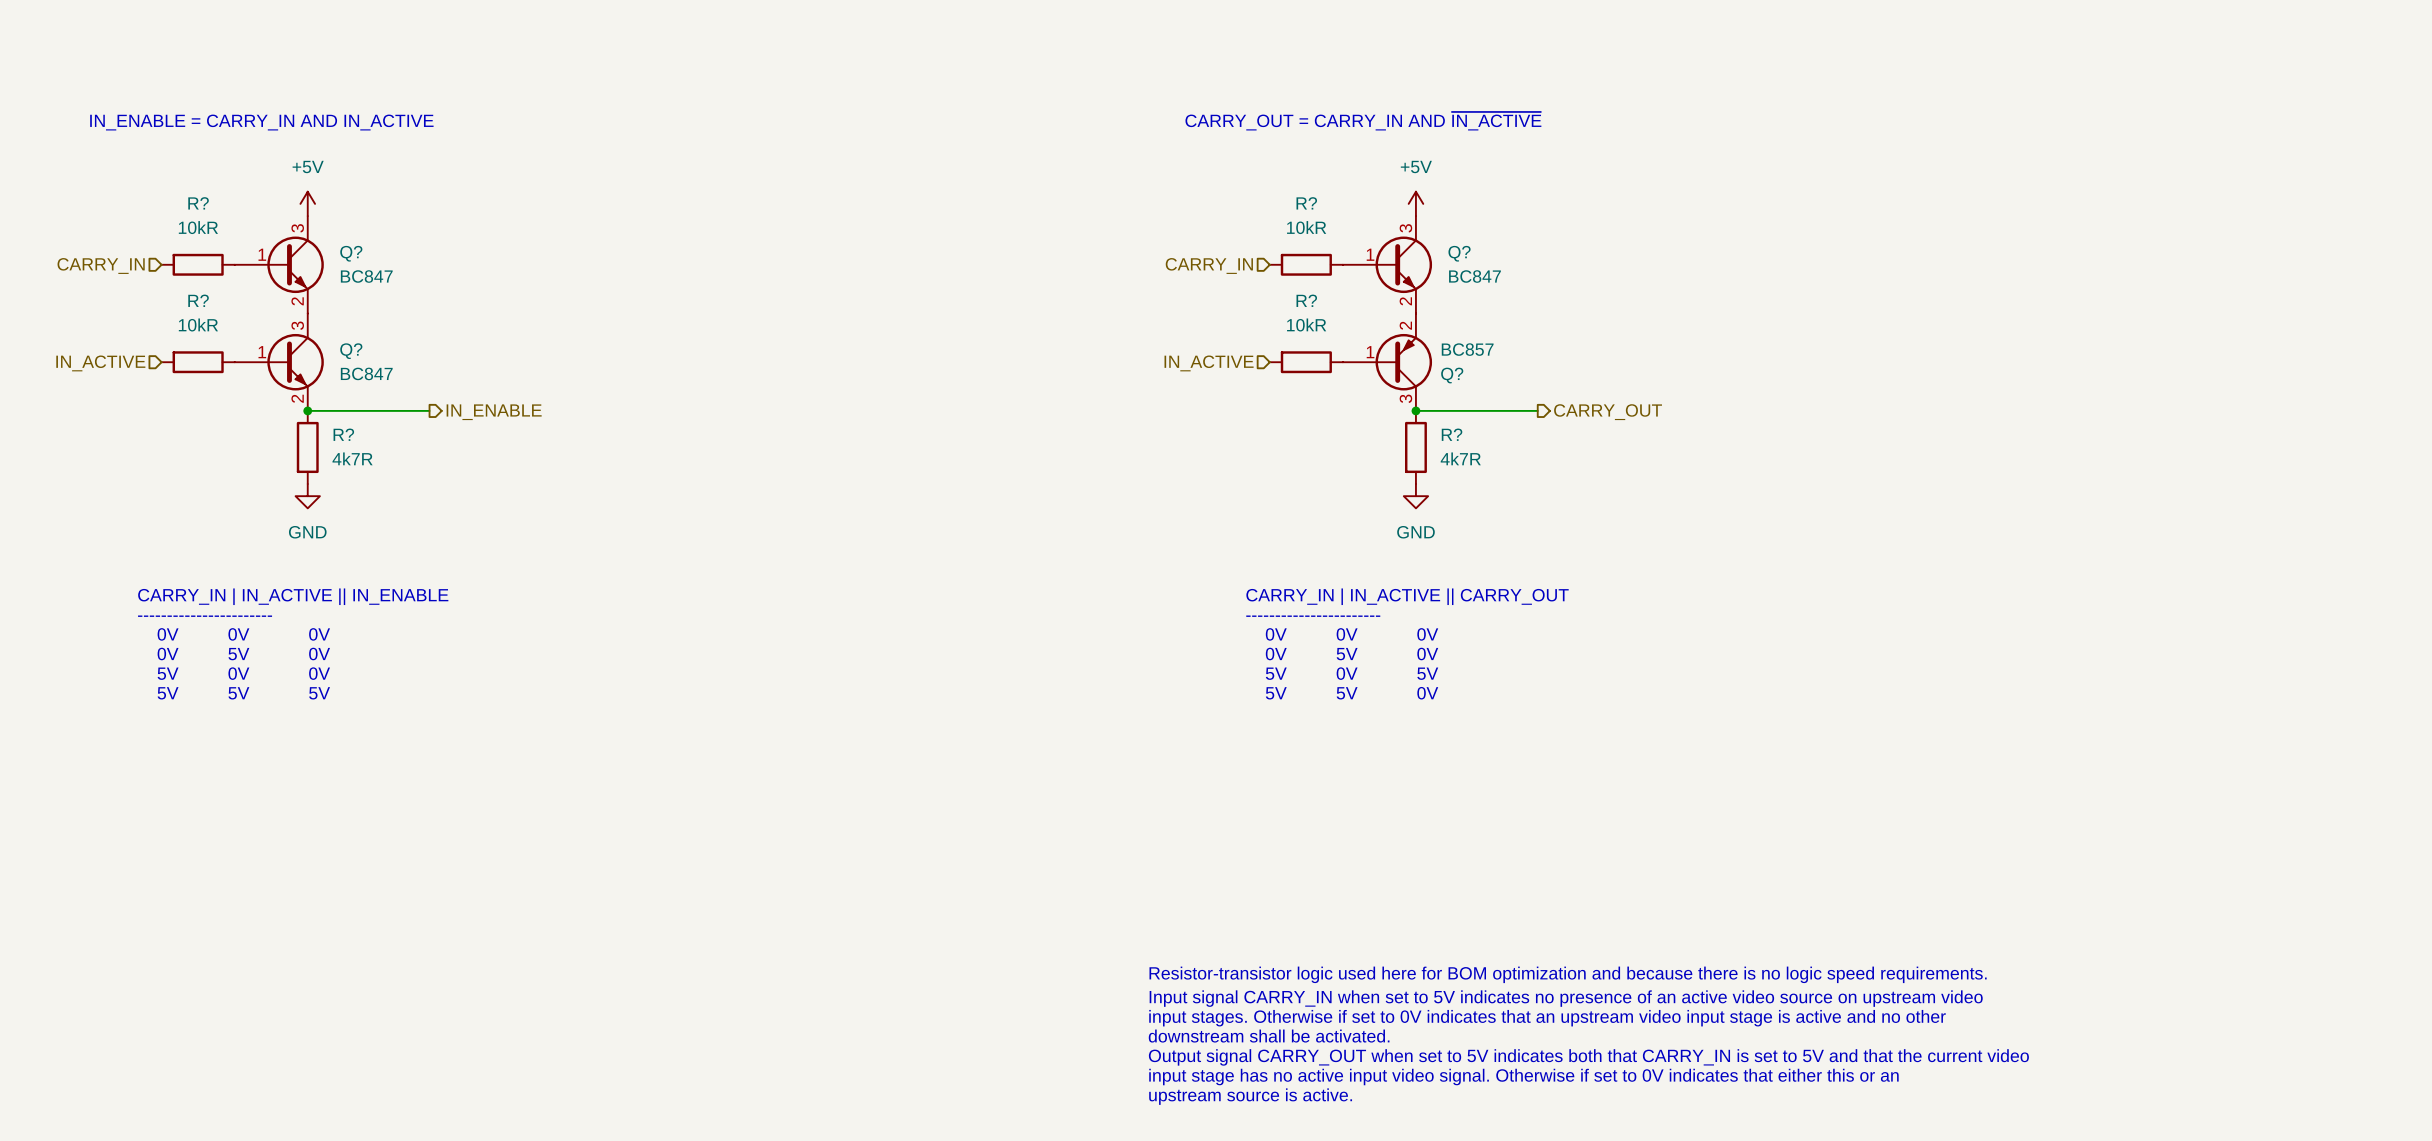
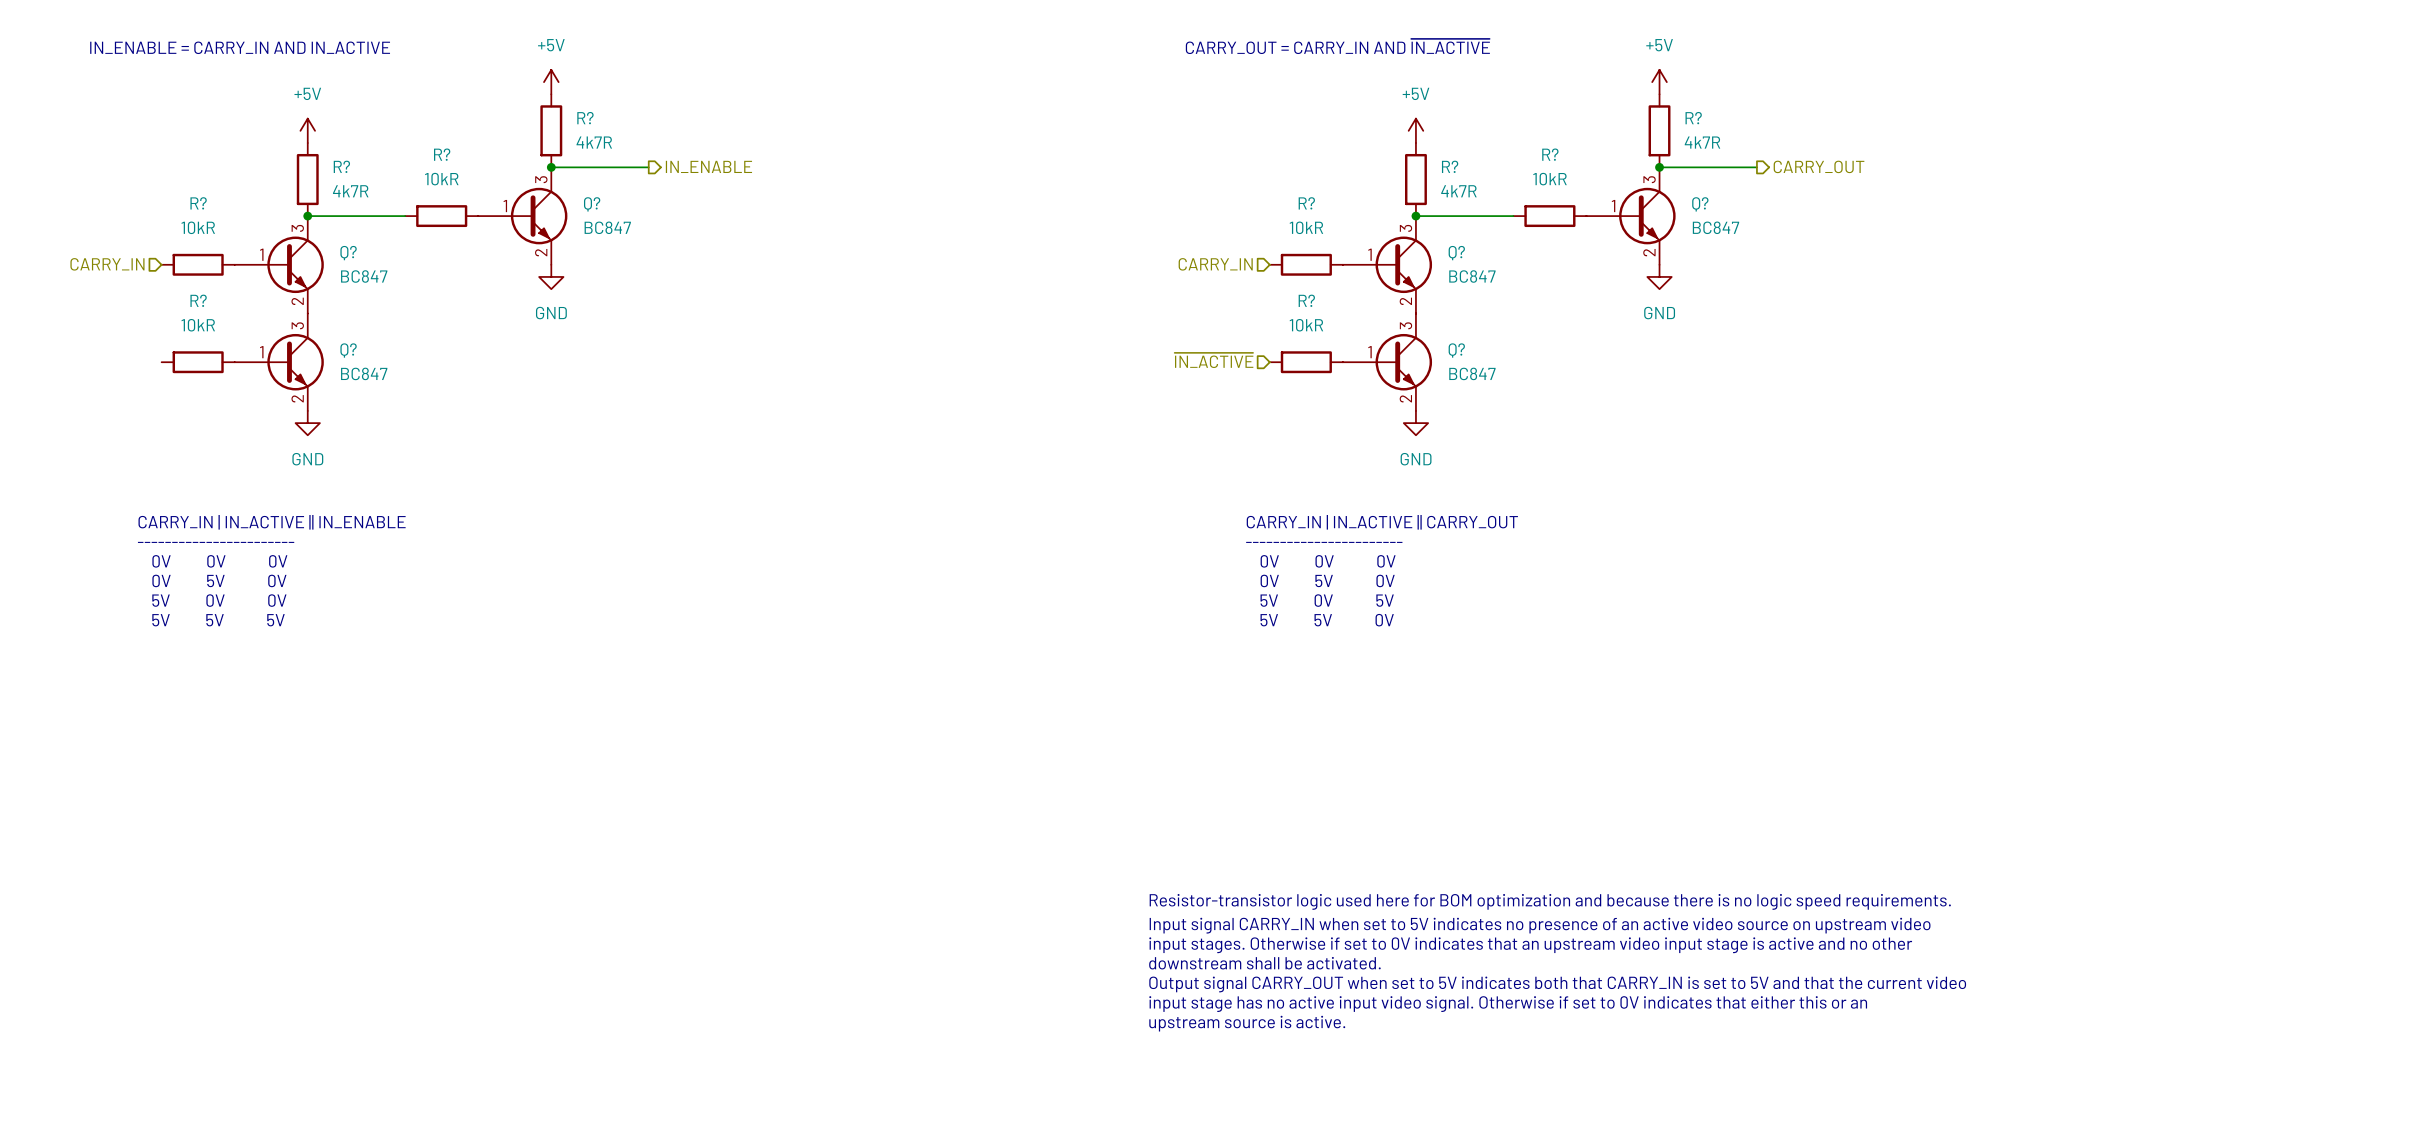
power symbol: none -> +5V (551, 82)
power symbol: none -> +5V (1659, 82)
text position: CARRY_OUT = CARRY_IN AND ~{IN_ACTIVE} (1363, 121) -> CARRY_OUT = CARRY_IN AND ~{IN_ACTIVE} (1337, 46)
text position: IN_ENABLE = CARRY_IN AND IN_ACTIVE (261, 122) -> IN_ENABLE = CARRY_IN AND IN_ACTIVE (240, 47)
R?: none -> 4k7R (551, 130)
R?: none -> 4k7R (1659, 130)
wire: none -> (551, 167) (648, 167)
junction: none -> (551, 167)
wire: none -> (1659, 167) (1756, 167)
junction: none -> (1659, 167)
hierarchical label: none -> IN_ENABLE (708, 166)
hierarchical label: none -> CARRY_OUT (1819, 166)
R?: none -> 4k7R (307, 179)
R?: none -> 4k7R (1415, 179)
power symbol position: +5V (307, 203) -> +5V (307, 130)
power symbol position: +5V (1415, 203) -> +5V (1415, 130)
wire: none -> (307, 216) (405, 216)
junction: none -> (307, 216)
R?: none -> 10kR (441, 216)
Q?: none -> BC847 (522, 216)
wire: none -> (1415, 216) (1513, 216)
junction: none -> (1415, 216)
R?: none -> 10kR (1549, 216)
Q?: none -> BC847 (1631, 216)
power symbol: none -> GND (551, 276)
power symbol: none -> GND (1659, 276)
Q? symbol: [1342, 313, 1433, 411] -> [1342, 313, 1433, 411]
Q? value: BC857 (1467, 349) -> BC847 (1472, 373)
hierarchical label: IN_ACTIVE (100, 363) -> none
hierarchical label: IN_ACTIVE (1209, 363) -> ~{IN_ACTIVE} (1213, 360)
Q? name position: Q? (1452, 375) -> Q? (1456, 350)
wire: (307, 410) (429, 410) -> none
junction: (307, 410) -> none
wire: (1415, 410) (1537, 410) -> none
junction: (1415, 410) -> none
hierarchical label: IN_ENABLE (494, 412) -> none
hierarchical label: CARRY_OUT (1608, 412) -> none
R?: 4k7R (307, 447) -> none
R?: 4k7R (1415, 447) -> none
power symbol position: GND (307, 496) -> GND (307, 423)
power symbol position: GND (1415, 496) -> GND (1415, 423)
text position: CARRY_IN | IN_ACTIVE || IN_ENABLE (293, 596) -> CARRY_IN | IN_ACTIVE || IN_ENABLE (272, 522)
text position: CARRY_IN | IN_ACTIVE || CARRY_OUT (1407, 596) -> CARRY_IN | IN_ACTIVE || CARRY_OUT (1382, 522)
text position: ----------------------- (205, 616) -> ----------------------- (216, 542)
text position: ----------------------- (1313, 616) -> ----------------------- (1324, 542)
text position: 0V 0V 0V (243, 634) -> 0V 0V 0V (219, 561)
text position: 0V 0V 0V (1352, 634) -> 0V 0V 0V (1328, 561)
text position: 0V 5V 0V (243, 654) -> 0V 5V 0V (219, 580)
text position: 0V 5V 0V (1352, 654) -> 0V 5V 0V (1327, 580)
text position: 5V 0V 0V (243, 673) -> 5V 0V 0V (219, 600)
text position: 5V 0V 5V (1352, 673) -> 5V 0V 5V (1327, 600)
text position: 5V 5V 5V (243, 693) -> 5V 5V 5V (218, 620)
text position: 5V 5V 0V (1352, 693) -> 5V 5V 0V (1327, 620)
text position: Resistor-transistor logic used here for BOM optimization and because there is no logic speed requirements. (1568, 974) -> Resistor-transistor logic used here for BOM optimization and because there is no logic speed requirements. (1550, 901)
text position: Input signal CARRY_IN when set to 5V indicates no presence of an active video source on upstream video (1566, 998) -> Input signal CARRY_IN when set to 5V indicates no presence of an active video source on upstream video (1540, 925)
text position: input stages. Otherwise if set to 0V indicates that an upstream video input stage is active and no other (1547, 1018) -> input stages. Otherwise if set to 0V indicates that an upstream video input stage is active and no other (1530, 945)
text position: downstream shall be activated. (1269, 1036) -> downstream shall be activated. (1264, 963)
text position: Output signal CARRY_OUT when set to 5V indicates both that CARRY_IN is set to 5V and that the current video (1588, 1057) -> Output signal CARRY_OUT when set to 5V indicates both that CARRY_IN is set to 5V and that the current video (1557, 984)
text position: input stage has no active input video signal. Otherwise if set to 0V indicates that either this or an (1523, 1077) -> input stage has no active input video signal. Otherwise if set to 0V indicates that either this or an (1508, 1004)
text position: upstream source is active. (1250, 1096) -> upstream source is active. (1247, 1023)

